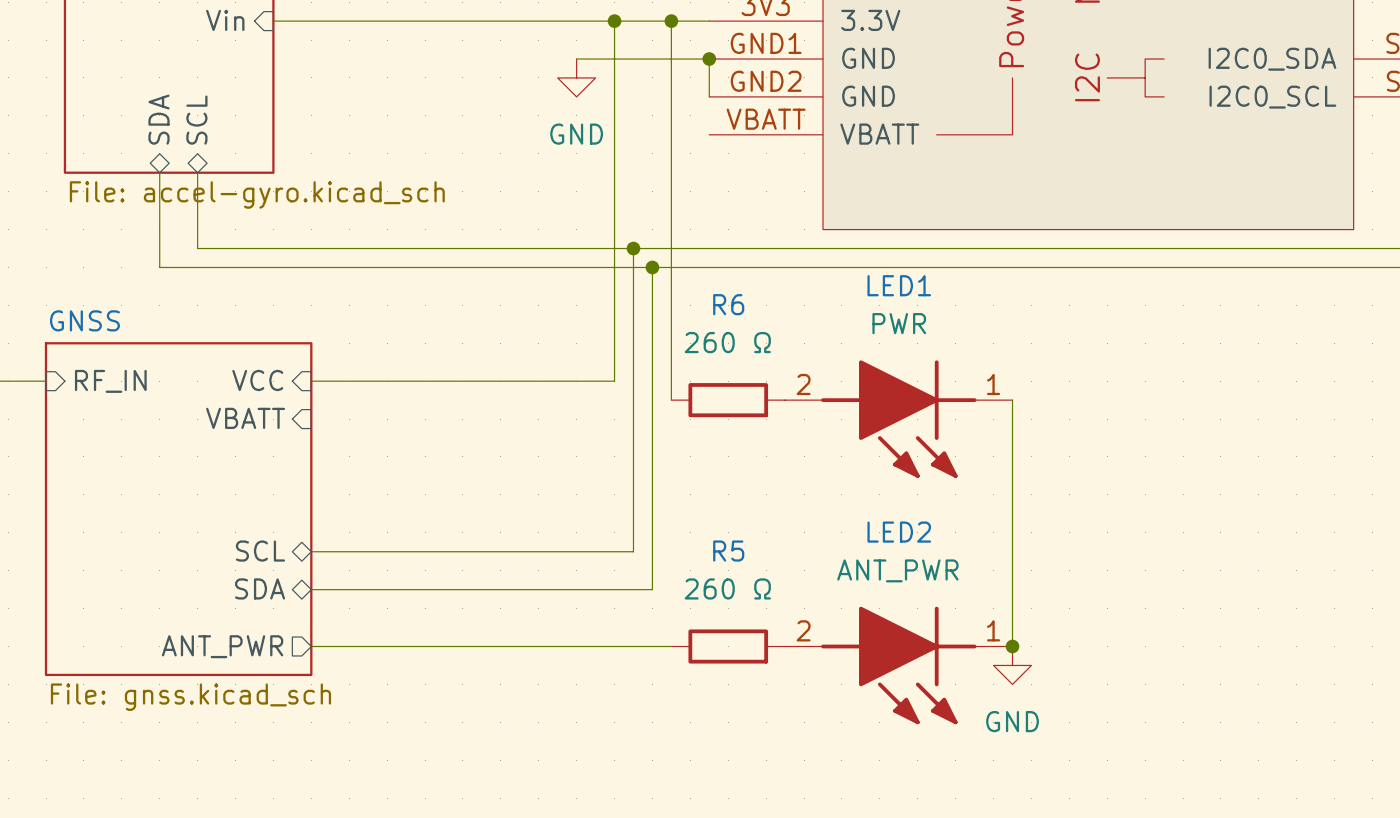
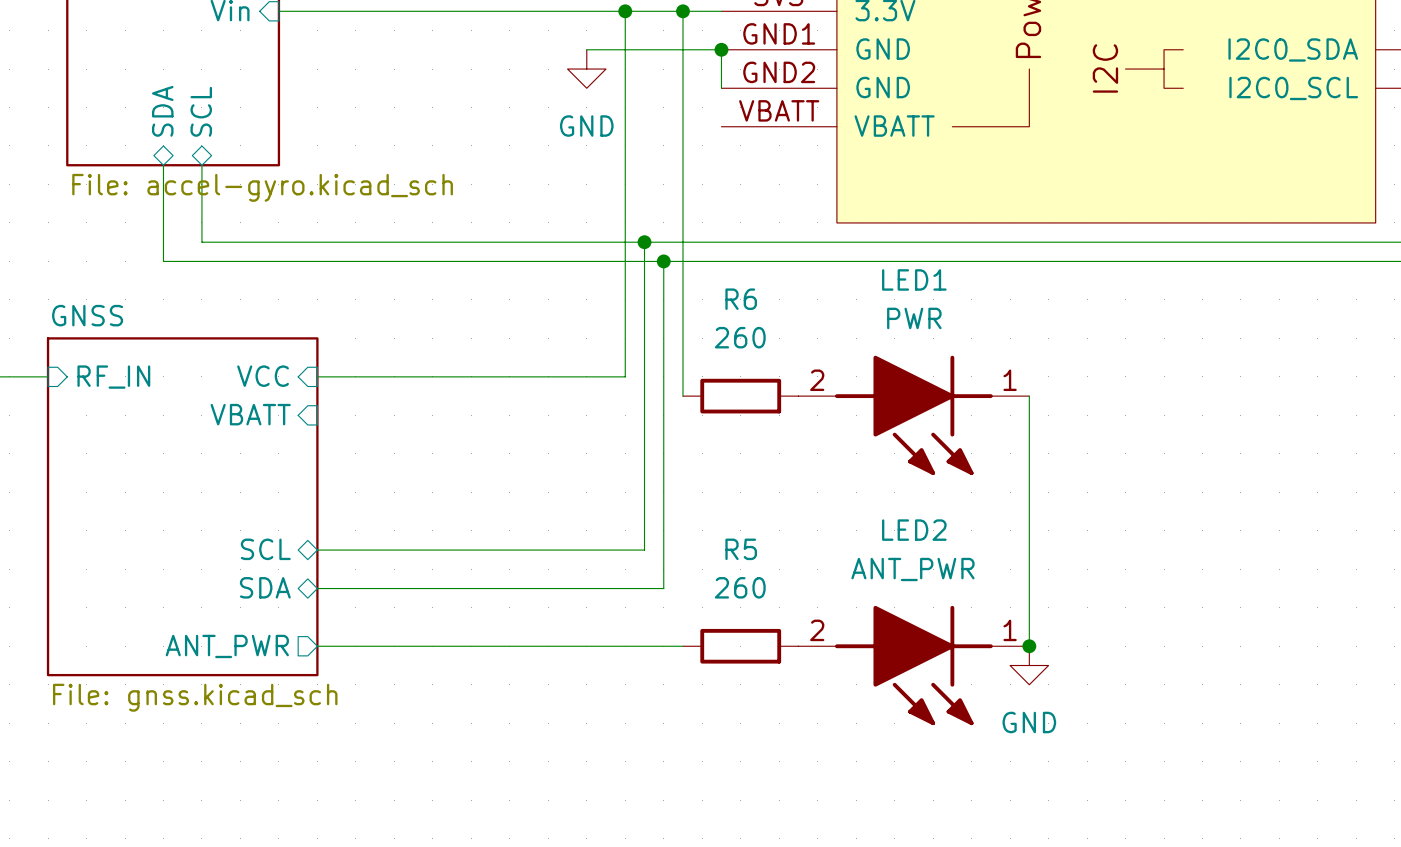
R6 value: 260 Ω (727, 342) -> 260 (740, 337)
R5 value: 260 Ω (727, 588) -> 260 (740, 587)

